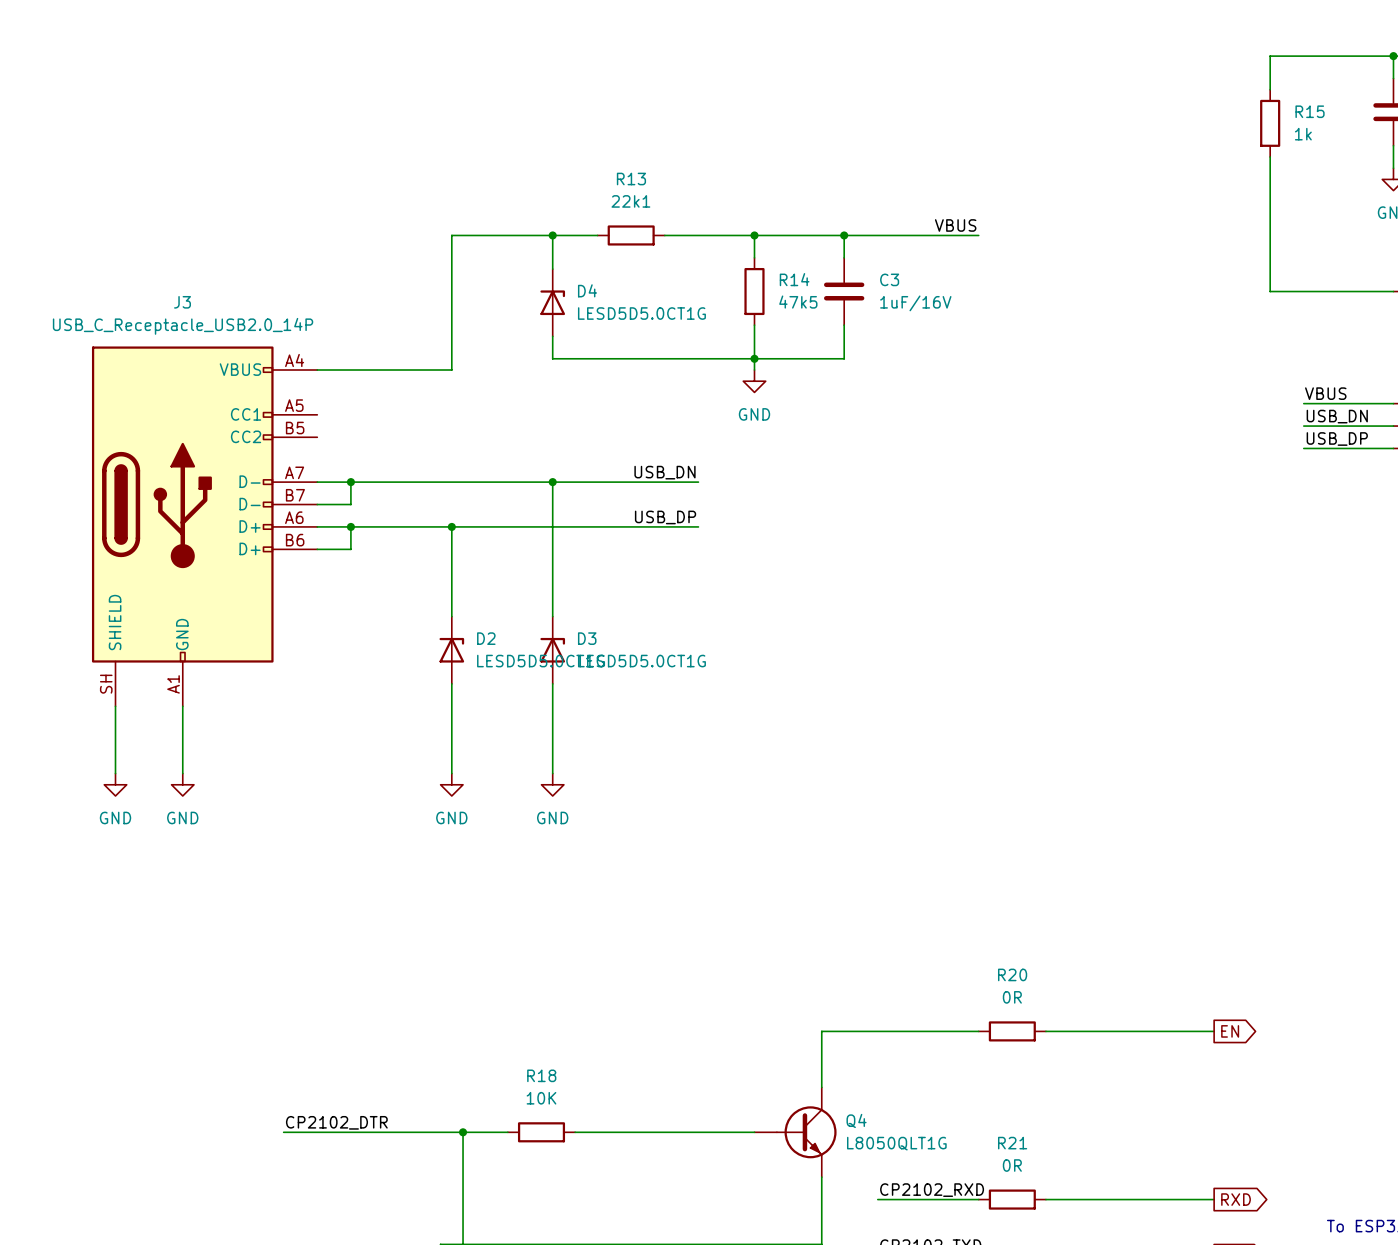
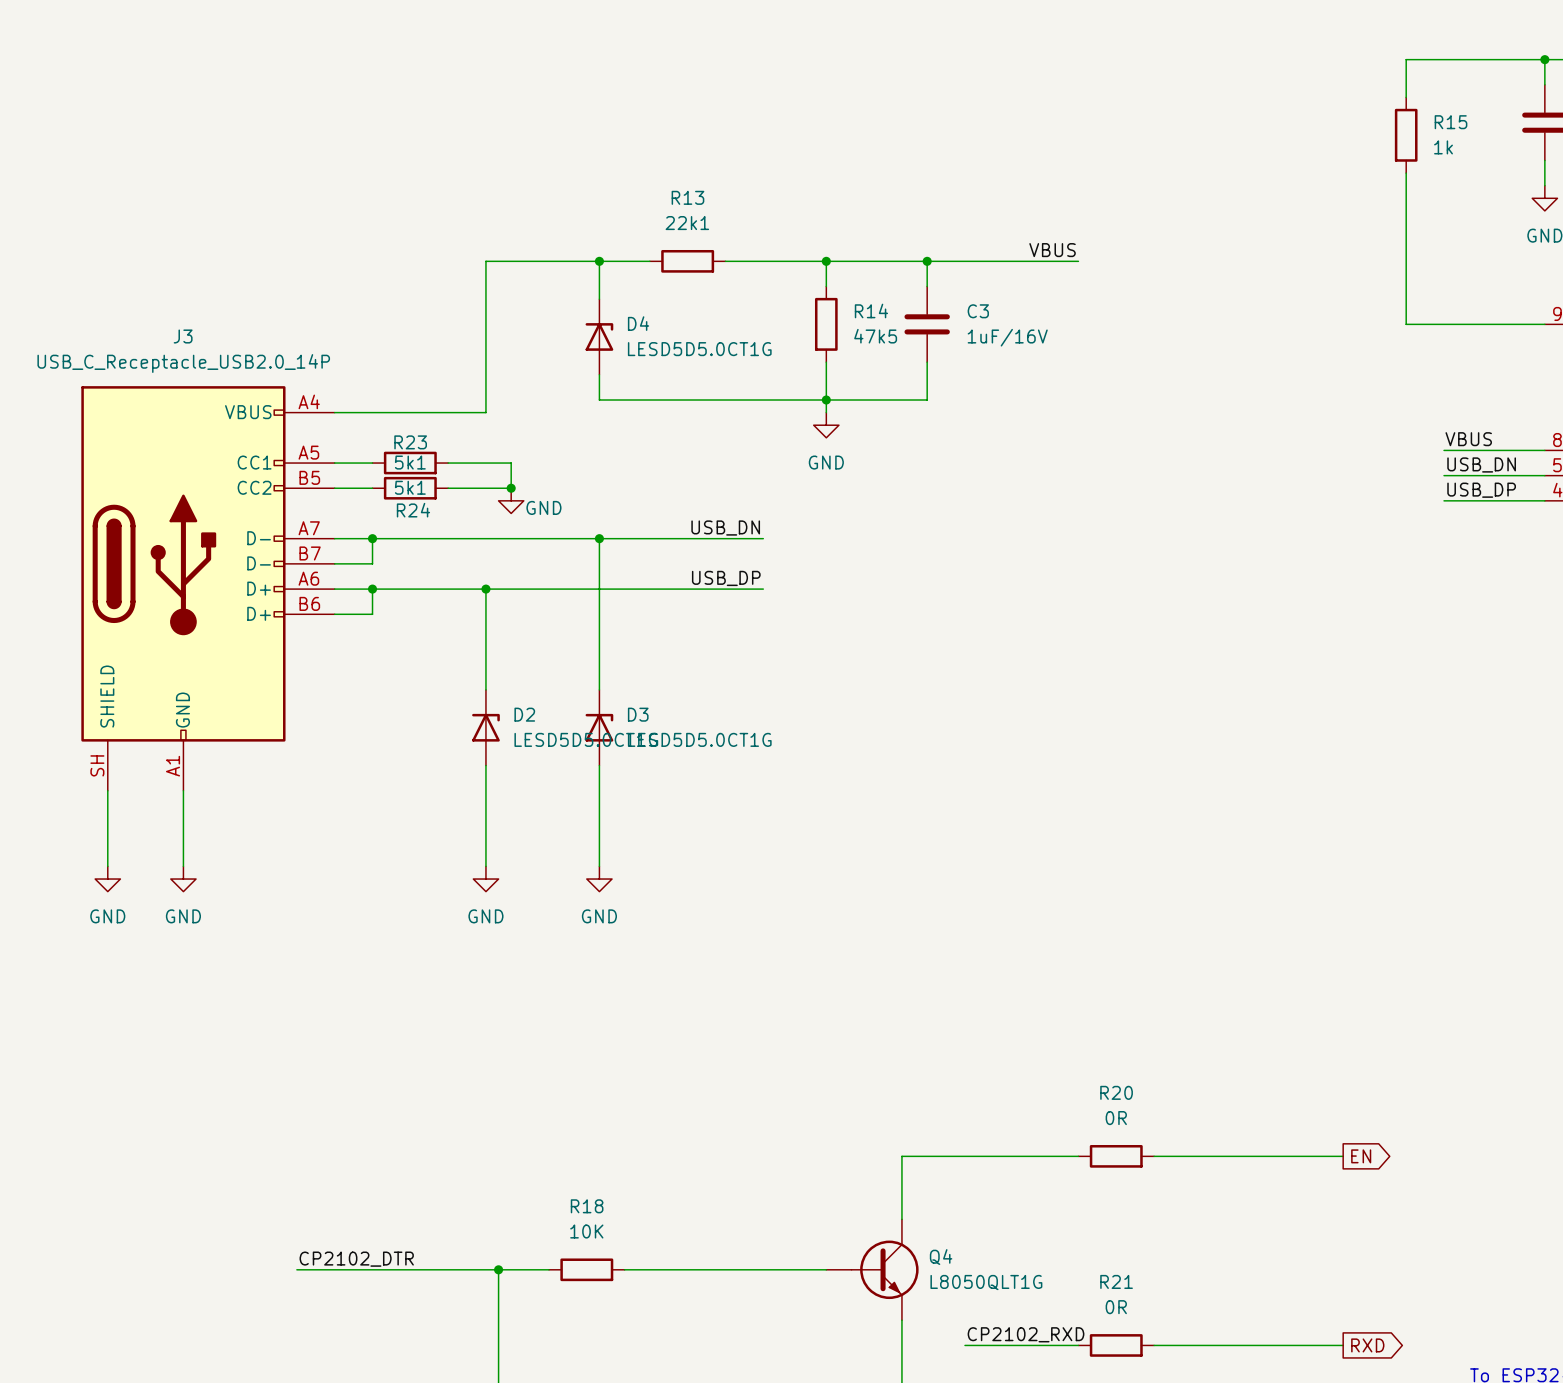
wire: none -> (334, 463) (372, 463)
R23: none -> 5k1 (410, 463)
wire: none -> (448, 463) (511, 463) (511, 488) (448, 488)
wire: none -> (334, 488) (372, 488)
R24: none -> 5k1 (410, 488)
junction: none -> (511, 488)
power symbol: none -> GND (511, 500)

